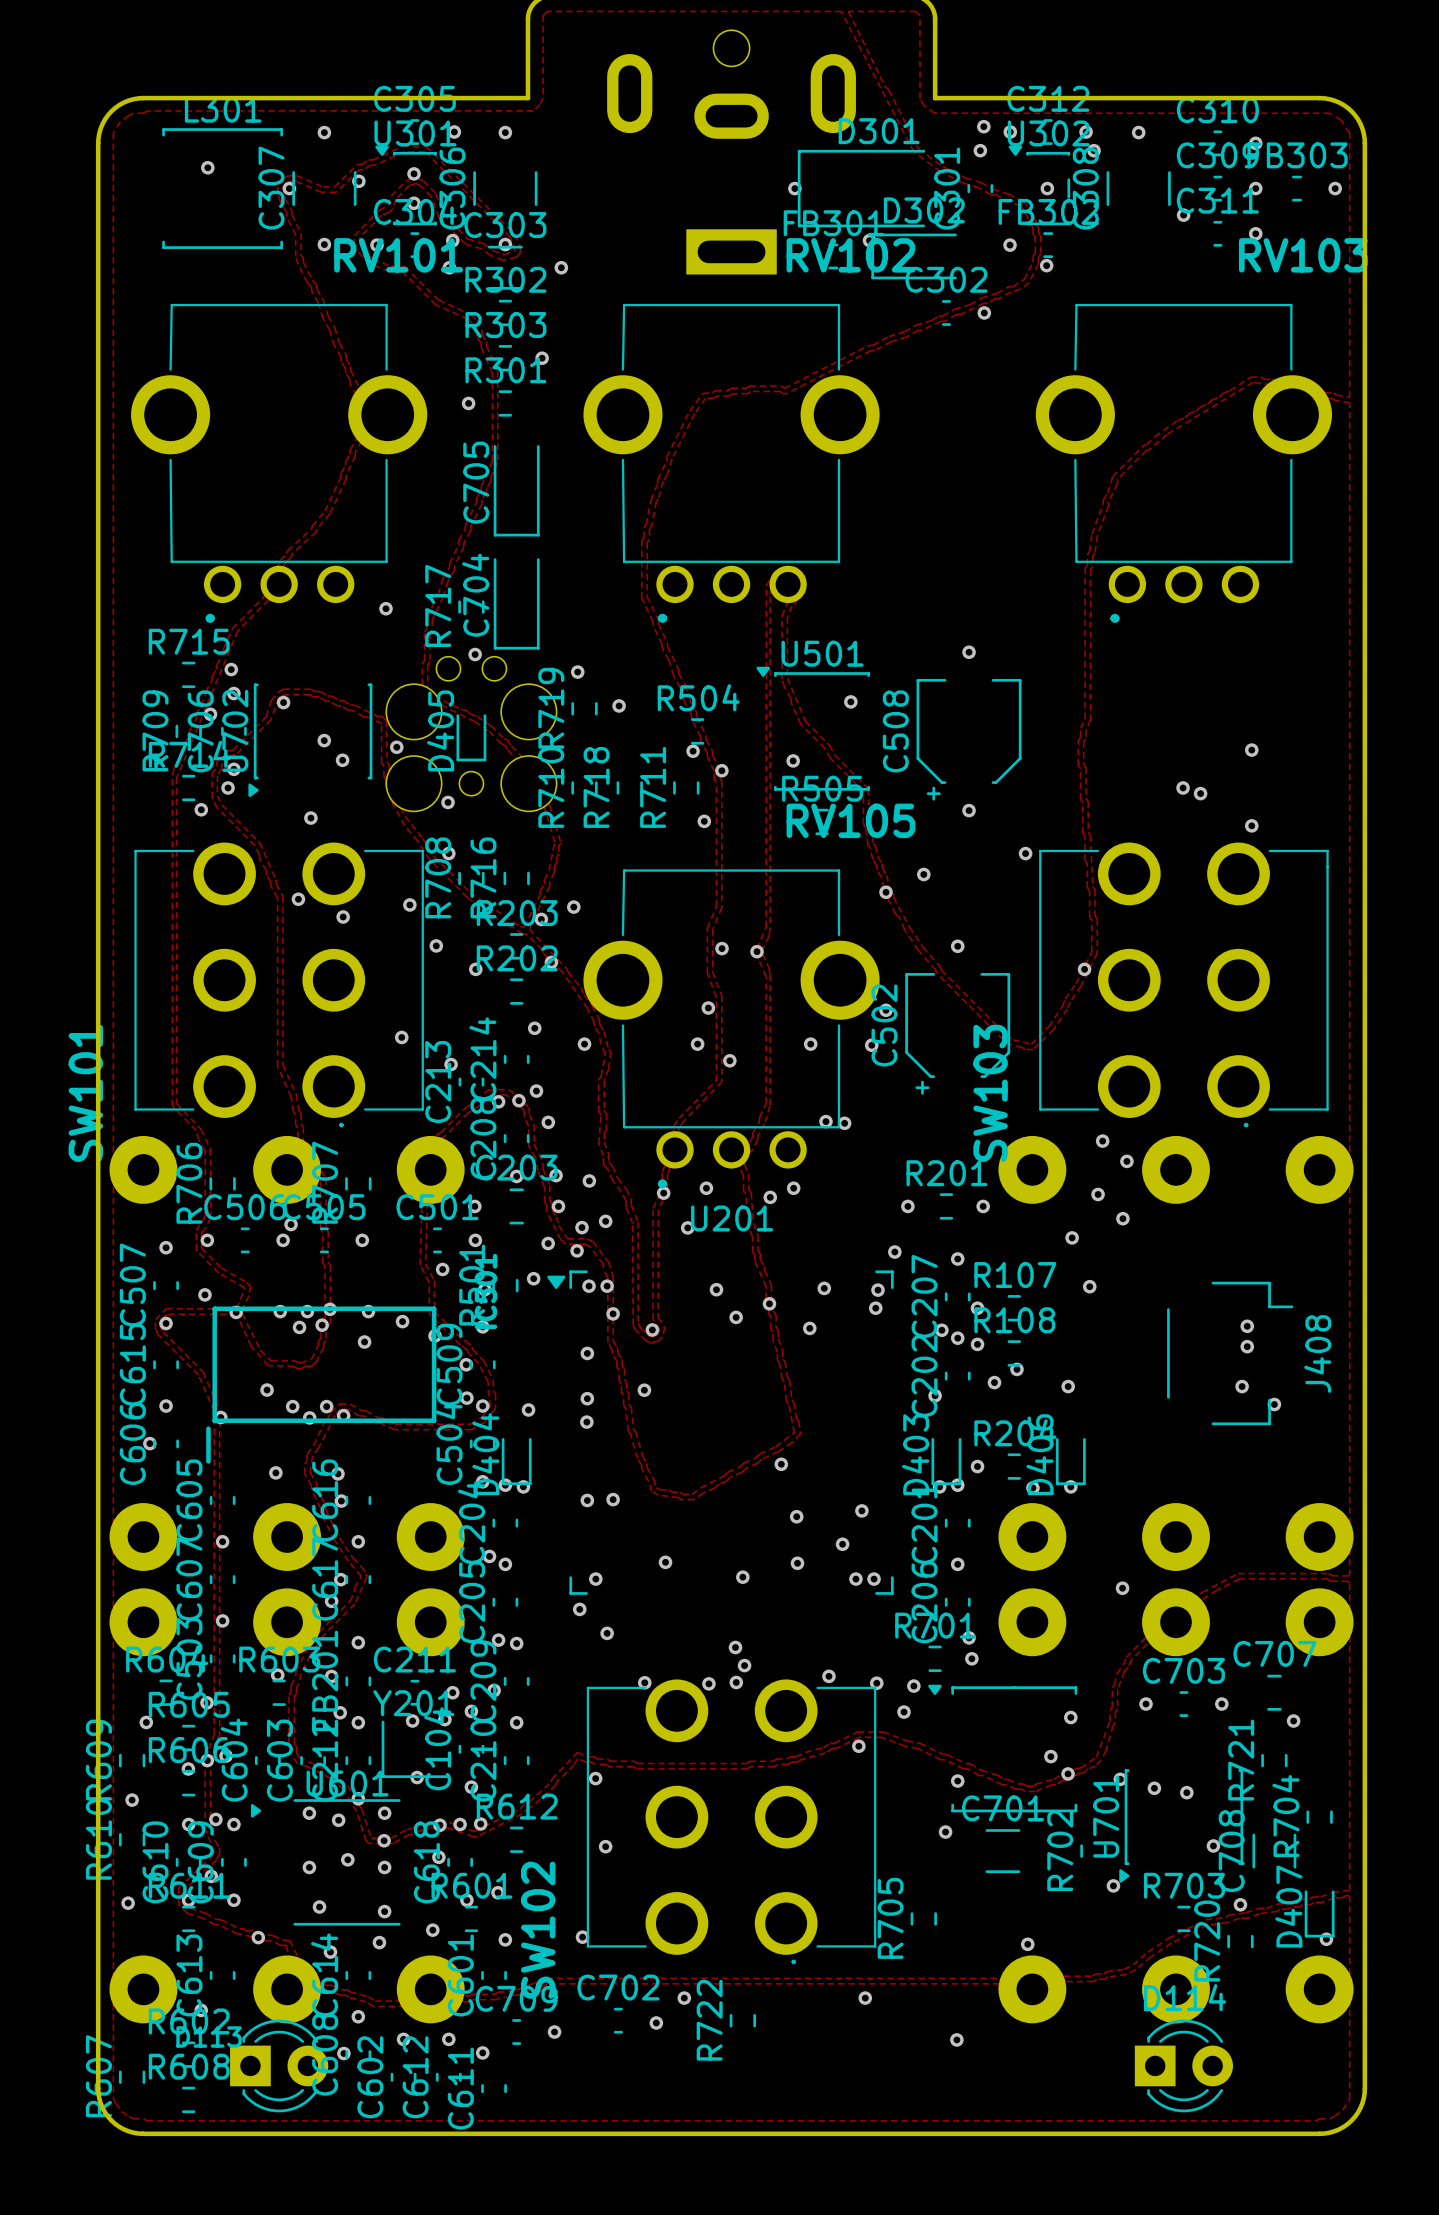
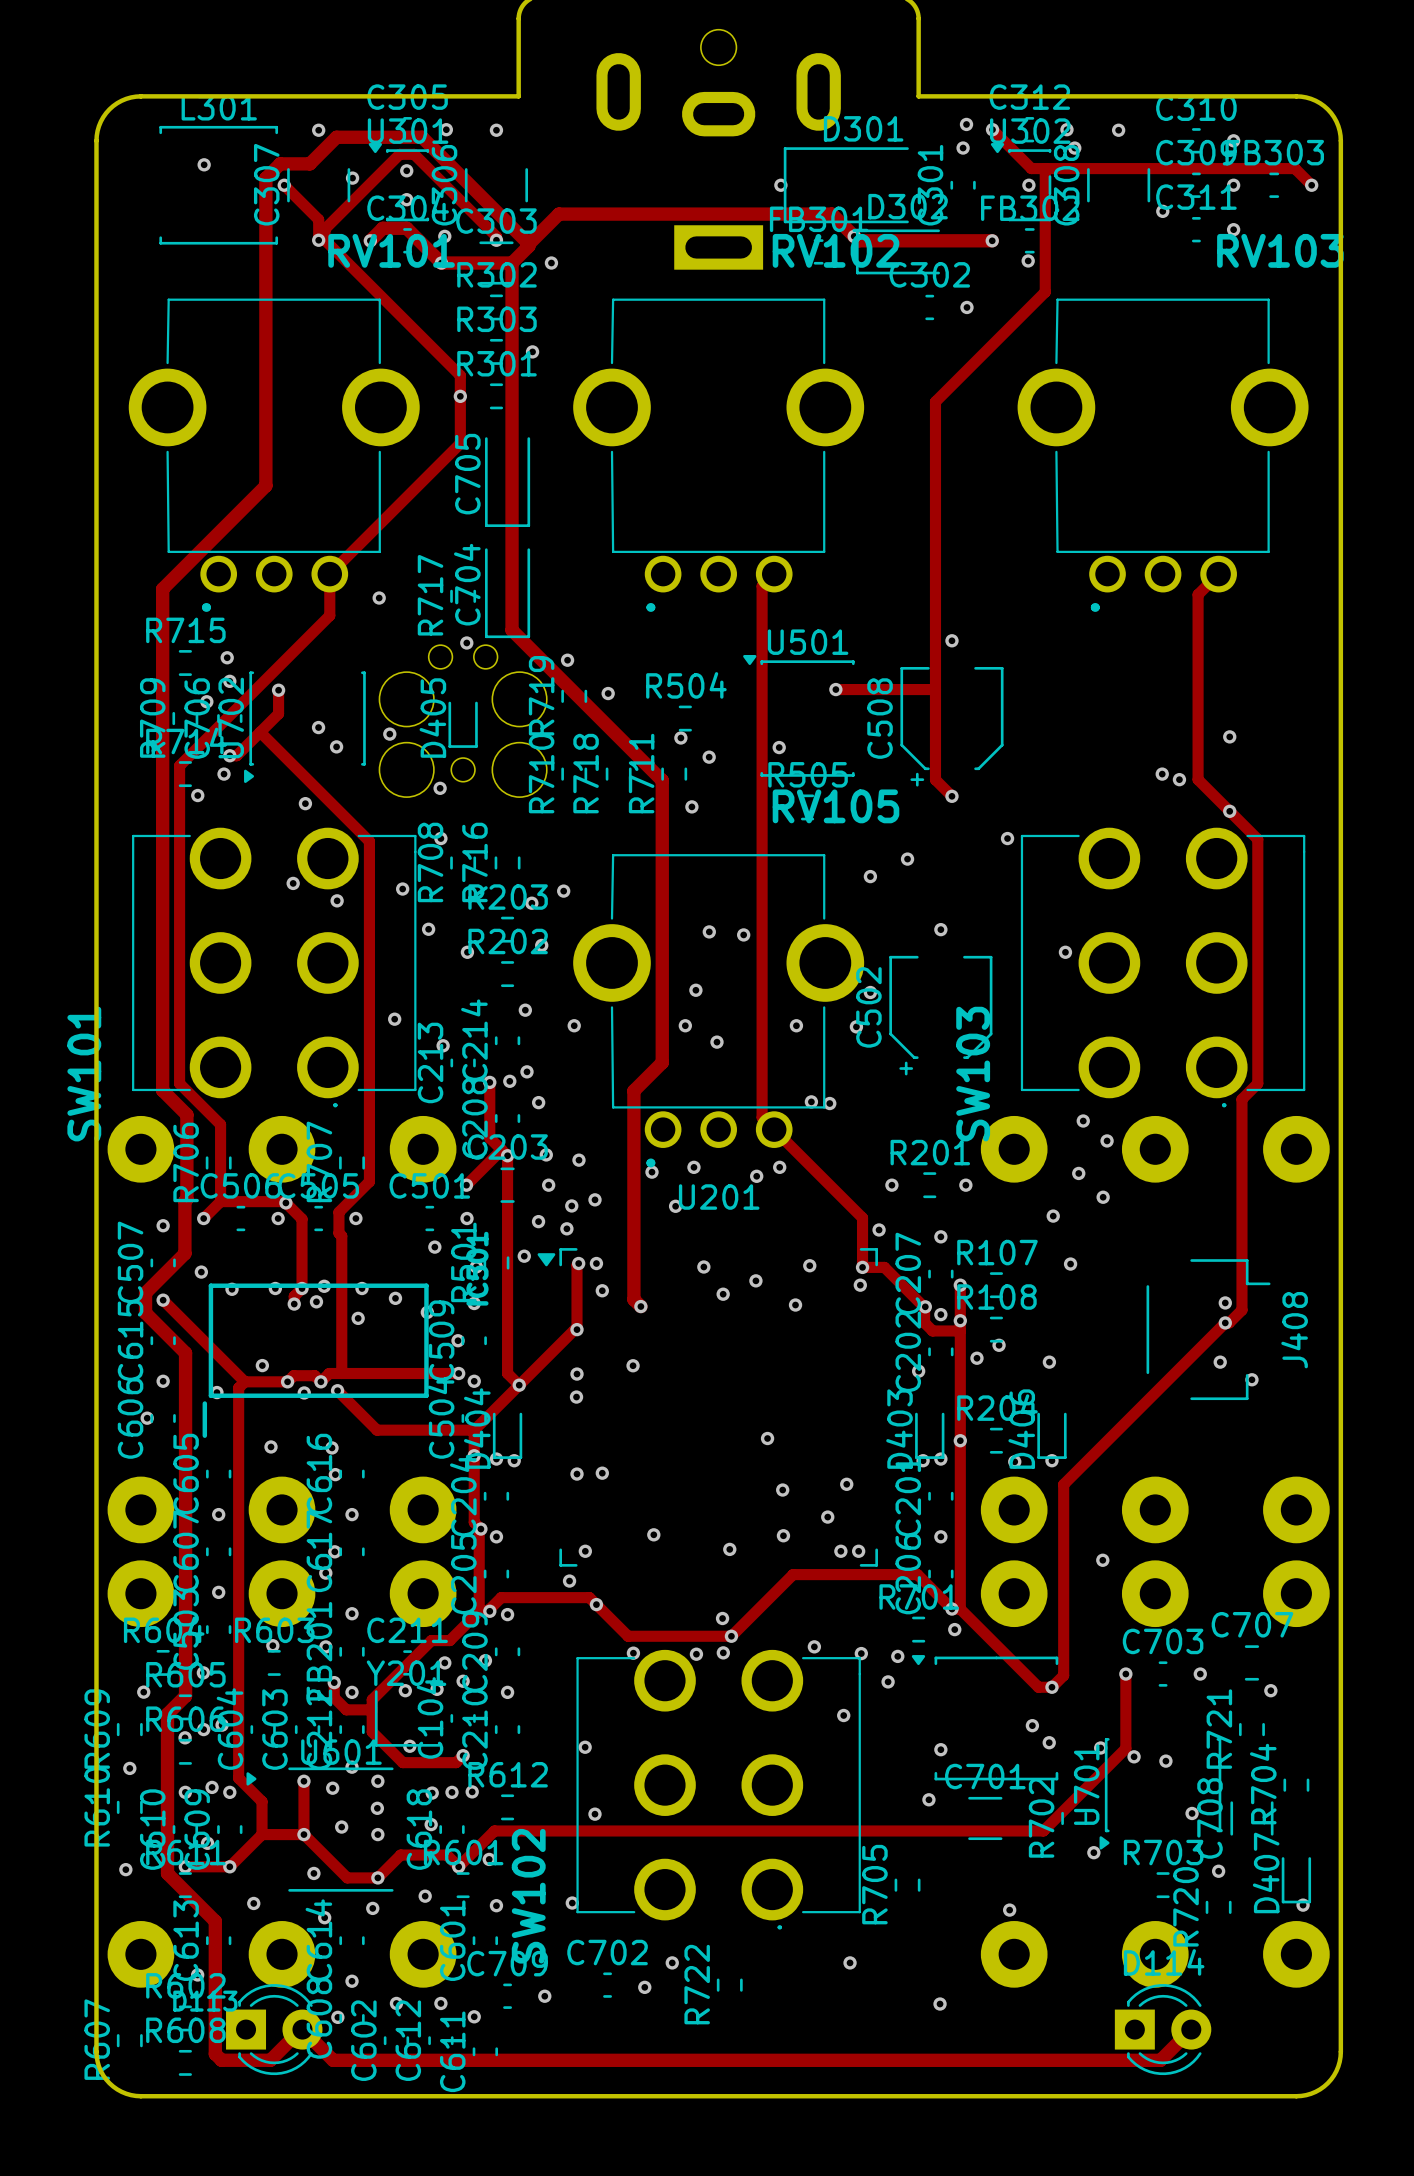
zone outline: (547, 11) (841, 11) (913, 151) (940, 171) (1019, 205) (1033, 228) (1035, 253) (1024, 279) (1013, 286) (868, 345) (784, 388) (781, 386) (749, 386) (746, 388) (731, 388) (728, 390) (702, 393) (689, 411) (657, 479) (641, 541) (641, 598) (680, 687) (684, 703) (691, 714) (700, 741) (707, 752) (716, 782) (716, 906) (707, 928) (707, 973) (716, 997) (716, 1080) (673, 1125) (673, 1146) (662, 1171) (662, 1189) (653, 1208) (653, 1319) (659, 1329) (657, 1334) (652, 1337) (640, 1327) (638, 1322) (638, 1221) (631, 1205) (630, 1198) (608, 1162) (608, 1154) (604, 1141) (606, 1113) (604, 1110) (604, 1080) (608, 1068) (610, 1051) (599, 1019) (581, 987) (567, 969) (529, 929) (549, 886) (560, 842) (549, 805) (533, 772) (507, 739) (491, 725) (465, 709) (461, 709) (425, 691) (427, 686) (432, 619) (497, 462) (497, 371) (481, 330) (471, 314) (438, 300) (404, 266) (391, 266) (373, 259) (362, 248) (359, 237) (382, 215) (392, 208) (396, 198) (409, 185) (416, 183) (431, 196) (438, 217) (465, 243) (481, 248) (490, 255) (503, 260) (516, 257) (520, 252) (520, 246) (514, 234) (426, 146) (402, 146) (357, 164) (334, 186) (323, 186) (296, 175) (286, 176) (277, 184) (279, 200) (295, 234) (295, 256) (298, 264) (311, 286) (364, 417) (325, 510) (311, 528) (287, 550) (280, 560) (264, 596) (232, 628) (172, 775) (172, 1105) (196, 1130) (205, 1151) (205, 1216) (196, 1230) (196, 1250) (218, 1272) (244, 1287) (236, 1308) (166, 1308) (155, 1319) (155, 1328) (158, 1334) (198, 1374) (214, 1411) (214, 1734) (205, 1758) (205, 1828) (214, 1852) (211, 1856) (178, 1887) (178, 1904) (187, 1913) (203, 1918) (237, 1933) (286, 1945) (300, 1979) (307, 1985) (345, 1995) (373, 2006) (405, 2006) (409, 2004) (422, 2004) (434, 1999) (461, 1999) (468, 2001) (472, 1999) (496, 1999) (499, 1997) (519, 1995) (547, 1983) (1061, 1983) (1065, 1981) (1093, 1981) (1126, 1974) (1171, 1943) (1207, 1925) (1227, 1922) (1280, 1909) (1288, 1909) (1349, 1895) (1349, 2098) (1342, 2110) (1329, 2118) (1319, 2118) (1316, 2120) (146, 2120) (128, 2116) (121, 2111) (113, 2098) (113, 133) (120, 121) (128, 115) (146, 110) (533, 110) (540, 104) (543, 98) (543, 15) (547, 11) -> none
zone outline: (848, 11) (915, 11) (919, 15) (920, 98) (924, 105) (934, 113) (1329, 113) (1341, 120) (1349, 133) (1349, 397) (1313, 388) (1304, 388) (1292, 383) (1284, 383) (1272, 379) (1250, 377) (1177, 420) (1154, 436) (1112, 476) (1092, 533) (1087, 565) (1085, 568) (1085, 718) (1078, 740) (1078, 765) (1080, 768) (1080, 799) (1082, 802) (1082, 833) (1085, 836) (1085, 860) (1087, 863) (1087, 887) (1089, 890) (1089, 916) (1091, 920) (1091, 951) (1062, 1006) (1048, 1026) (1031, 1044) (1013, 1039) (1006, 1035) (941, 970) (909, 927) (893, 897) (873, 843) (868, 823) (868, 788) (834, 755) (829, 745) (805, 721) (787, 678) (787, 617) (791, 605) (805, 592) (805, 576) (795, 567) (783, 567) (773, 573) (766, 585) (766, 927) (757, 948) (757, 956) (766, 976) (766, 1103) (752, 1137) (739, 1160) (739, 1165) (743, 1175) (743, 1190) (745, 1193) (748, 1224) (752, 1236) (752, 1252) (766, 1286) (770, 1328) (794, 1432) (775, 1446) (759, 1454) (691, 1494) (682, 1494) (656, 1487) (633, 1429) (629, 1393) (624, 1379) (624, 1368) (613, 1341) (613, 1276) (608, 1261) (592, 1241) (586, 1238) (567, 1238) (558, 1225) (552, 1209) (549, 1185) (543, 1169) (542, 1162) (534, 1144) (534, 1124) (528, 1107) (508, 1089) (487, 1090) (436, 1135) (435, 1153) (422, 1190) (420, 1264) (429, 1282) (429, 1314) (467, 1349) (478, 1363) (487, 1381) (490, 1406) (481, 1417) (470, 1424) (395, 1424) (350, 1404) (340, 1403) (330, 1412) (323, 1424) (307, 1454) (304, 1474) (334, 1540) (361, 1576) (349, 1601) (319, 1632) (295, 1671) (288, 1694) (288, 1744) (291, 1754) (297, 1763) (330, 1778) (343, 1788) (356, 1811) (366, 1840) (369, 1843) (392, 1843) (409, 1834) (429, 1827) (447, 1827) (476, 1836) (522, 1813) (532, 1806) (555, 1785) (577, 1758) (595, 1764) (633, 1766) (636, 1768) (747, 1768) (750, 1766) (774, 1766) (777, 1764) (797, 1762) (836, 1748) (859, 1737) (881, 1737) (905, 1746) (918, 1748) (1002, 1784) (1025, 1791) (1035, 1791) (1083, 1773) (1101, 1760) (1115, 1722) (1117, 1689) (1124, 1671) (1131, 1659) (1178, 1615) (1216, 1590) (1239, 1578) (1327, 1578) (1330, 1581) (1347, 1581) (1349, 1583) (1349, 1890) (1278, 1903) (1225, 1917) (1205, 1919) (1168, 1938) (1123, 1969) (1095, 1973) (1092, 1976) (1064, 1976) (1060, 1978) (546, 1978) (517, 1989) (498, 1992) (495, 1994) (471, 1994) (467, 1996) (462, 1994) (432, 1994) (404, 2001) (375, 2001) (347, 1989) (309, 1980) (298, 1963) (289, 1940) (239, 1928) (205, 1913) (189, 1908) (182, 1901) (183, 1890) (216, 1859) (219, 1853) (219, 1848) (210, 1827) (210, 1759) (219, 1735) (219, 1410) (203, 1372) (163, 1332) (159, 1325) (159, 1320) (167, 1314) (236, 1314) (251, 1346) (268, 1365) (293, 1366) (301, 1368) (311, 1366) (316, 1361) (323, 1347) (325, 1331) (330, 1322) (330, 1265) (328, 1261) (328, 1231) (325, 1227) (325, 1178) (316, 1161) (303, 1146) (301, 1113) (296, 1094) (283, 1065) (282, 896) (259, 842) (221, 804) (217, 795) (217, 775) (221, 764) (230, 755) (236, 754) (270, 719) (278, 697) (284, 694) (309, 694) (318, 696) (381, 723) (381, 762) (383, 766) (383, 777) (390, 800) (404, 825) (429, 859) (467, 897) (506, 924) (522, 934) (526, 934) (542, 949) (562, 972) (587, 1008) (594, 1022) (605, 1053) (598, 1079) (598, 1111) (601, 1114) (598, 1143) (603, 1155) (603, 1164) (625, 1200) (626, 1207) (632, 1223) (633, 1324) (635, 1330) (645, 1340) (650, 1343) (658, 1341) (662, 1336) (664, 1327) (658, 1317) (658, 1209) (667, 1190) (667, 1173) (678, 1148) (678, 1128) (721, 1081) (721, 996) (712, 972) (712, 929) (721, 907) (721, 781) (712, 750) (705, 739) (696, 712) (690, 700) (685, 685) (647, 596) (647, 542) (663, 481) (694, 413) (705, 398) (729, 395) (732, 393) (747, 393) (750, 391) (780, 391) (786, 393) (870, 350) (1020, 289) (1029, 282) (1038, 264) (1040, 254) (1040, 236) (1038, 226) (1028, 207) (1022, 201) (943, 166) (918, 148) (848, 11) -> none
track: none -> (992, 129) (1031, 168) (1295, 168) (1311, 185)
zone outline: (404, 151) (425, 151) (510, 237) (515, 250) (504, 254) (483, 243) (468, 239) (443, 214) (436, 193) (423, 180) (417, 177) (405, 181) (391, 196) (388, 205) (379, 210) (354, 235) (354, 245) (357, 250) (370, 264) (389, 271) (402, 271) (435, 304) (468, 319) (476, 332) (492, 372) (492, 461) (427, 617) (420, 693) (424, 698) (429, 699) (474, 721) (506, 746) (519, 761) (535, 786) (535, 791) (544, 807) (554, 842) (549, 870) (539, 895) (524, 927) (520, 926) (470, 892) (434, 856) (405, 816) (396, 798) (389, 775) (389, 764) (387, 761) (386, 720) (381, 716) (311, 689) (283, 689) (278, 692) (271, 700) (266, 716) (232, 750) (227, 750) (216, 761) (212, 774) (212, 798) (217, 807) (254, 845) (277, 897) (277, 1066) (291, 1096) (295, 1114) (295, 1125) (297, 1128) (298, 1148) (311, 1164) (320, 1180) (320, 1229) (322, 1232) (322, 1263) (325, 1266) (325, 1320) (320, 1330) (320, 1338) (311, 1359) (300, 1363) (295, 1360) (271, 1360) (260, 1350) (242, 1313) (250, 1286) (221, 1268) (201, 1248) (201, 1232) (210, 1217) (210, 1149) (201, 1129) (176, 1103) (176, 777) (237, 630) (268, 599) (285, 562) (292, 553) (316, 531) (329, 513) (370, 417) (316, 284) (303, 262) (301, 255) (300, 233) (285, 198) (283, 186) (289, 181) (296, 181) (321, 192) (336, 192) (359, 169) (404, 151) -> none
track: none -> (1045, 168) (1045, 292) (935, 401) (935, 779) (951, 796)
track: none -> (284, 185) (318, 219) (318, 240) (325, 240)
track: none -> (325, 240) (325, 229) (399, 154) (414, 154) (496, 236) (496, 240)
track: none -> (325, 240) (460, 375) (460, 443) (329, 574) (329, 615) (179, 765) (179, 1083) (220, 1124) (220, 1201)
track: none -> (370, 240) (382, 228) (406, 228) (441, 263) (512, 263)
track: none -> (992, 240) (858, 240) (831, 214) (558, 214) (528, 244)
track: none -> (528, 244) (512, 263)
track: none -> (528, 244) (422, 137) (336, 137) (309, 163) (280, 163) (265, 178) (265, 485) (162, 589) (162, 1090) (186, 1114) (186, 1199) (184, 1201) (184, 1253) (145, 1293) (145, 1313) (185, 1353) (185, 1696) (167, 1714) (167, 1873) (215, 1921) (215, 2054) (221, 2060) (270, 2060) (302, 2029) (333, 2060) (1160, 2060) (1191, 2029)
track: none -> (512, 263) (512, 630) (662, 780) (662, 1062) (633, 1090) (633, 1299) (640, 1306)
zone outline: (1252, 382) (1271, 384) (1283, 389) (1291, 389) (1303, 393) (1311, 393) (1323, 398) (1349, 402) (1349, 1575) (1332, 1575) (1328, 1573) (1238, 1573) (1202, 1592) (1166, 1617) (1126, 1657) (1116, 1673) (1112, 1687) (1109, 1721) (1096, 1757) (1081, 1768) (1033, 1786) (1026, 1786) (1004, 1779) (920, 1743) (906, 1740) (883, 1731) (857, 1731) (834, 1743) (796, 1756) (776, 1759) (773, 1761) (749, 1761) (746, 1763) (637, 1763) (634, 1761) (596, 1759) (577, 1752) (551, 1782) (529, 1801) (520, 1808) (474, 1831) (449, 1822) (428, 1822) (407, 1829) (391, 1838) (371, 1838) (361, 1809) (347, 1785) (332, 1772) (298, 1757) (294, 1743) (294, 1696) (301, 1673) (323, 1635) (354, 1603) (366, 1577) (361, 1566) (353, 1558) (339, 1537) (310, 1472) (312, 1456) (335, 1415) (340, 1409) (348, 1409) (394, 1429) (471, 1429) (484, 1422) (495, 1408) (493, 1380) (483, 1360) (472, 1346) (434, 1311) (434, 1280) (425, 1264) (427, 1191) (441, 1155) (441, 1137) (490, 1094) (506, 1094) (524, 1110) (524, 1116) (528, 1126) (528, 1145) (535, 1157) (537, 1170) (544, 1187) (546, 1211) (560, 1239) (566, 1244) (585, 1244) (589, 1246) (603, 1264) (607, 1277) (607, 1342) (619, 1370) (619, 1380) (623, 1395) (628, 1431) (651, 1491) (658, 1495) (678, 1497) (681, 1499) (694, 1499) (762, 1459) (778, 1451) (792, 1442) (800, 1433) (776, 1327) (771, 1285) (758, 1250) (757, 1235) (753, 1223) (748, 1174) (744, 1164) (757, 1139) (770, 1106) (770, 974) (762, 949) (770, 929) (770, 596) (771, 587) (778, 576) (784, 572) (793, 572) (800, 578) (800, 590) (787, 603) (782, 616) (781, 679) (784, 686) (800, 724) (824, 748) (830, 758) (863, 791) (863, 824) (868, 845) (895, 913) (918, 950) (936, 973) (1003, 1039) (1011, 1044) (1024, 1049) (1033, 1049) (1053, 1029) (1067, 1008) (1097, 953) (1097, 919) (1095, 915) (1095, 889) (1092, 886) (1090, 835) (1088, 832) (1088, 801) (1085, 798) (1083, 741) (1090, 719) (1090, 569) (1092, 566) (1097, 535) (1117, 479) (1146, 450) (1166, 434) (1252, 382) -> none
track: none -> (774, 574) (762, 586) (762, 1117) (862, 1217) (862, 1267) (884, 1267) (924, 1307)
track: none -> (1218, 574) (1198, 594) (1198, 779) (1257, 839) (1257, 1083) (1241, 1099) (1241, 1310) (1229, 1322) (1225, 1322) (1063, 1484) (1063, 1675) (1051, 1687) (1038, 1687) (960, 1609)
track: none -> (835, 689) (935, 689)
track: none -> (278, 690) (278, 713) (260, 732)
track: none -> (260, 732) (369, 841) (369, 1181) (338, 1212) (338, 1233) (341, 1236) (341, 1373)
track: none -> (260, 732) (236, 755) (229, 755)
track: none -> (489, 1082) (489, 1137) (507, 1155) (507, 1373) (519, 1385)
track: none -> (501, 1149) (466, 1185)
track: none -> (220, 1201) (203, 1218)
track: none -> (220, 1201) (284, 1201) (302, 1219) (302, 1288) (294, 1296) (294, 1304)
track: none -> (578, 1263) (577, 1265) (577, 1329) (574, 1329) (474, 1430)
track: none -> (960, 1285) (960, 1609)
track: none -> (163, 1300) (244, 1381)
track: none -> (924, 1307) (924, 1322) (932, 1330) (960, 1330)
track: none -> (458, 1373) (329, 1373) (320, 1381) (314, 1375) (293, 1375) (287, 1381) (244, 1381)
track: none -> (244, 1381) (238, 1387) (238, 1778) (262, 1801) (262, 1834)
track: none -> (337, 1390) (377, 1430) (474, 1430)
track: none -> (474, 1430) (474, 1522) (480, 1529) (479, 1530) (479, 1611)
track: none -> (960, 1609) (951, 1609) (917, 1574) (793, 1574) (731, 1636) (628, 1636) (589, 1597) (501, 1597) (489, 1611) (479, 1611)
track: none -> (479, 1611) (449, 1640) (431, 1640) (372, 1699) (372, 1731) (402, 1762) (456, 1762) (463, 1755)
track: none -> (1125, 1674) (1125, 1748) (1043, 1830) (494, 1830) (458, 1866) (446, 1855) (400, 1855) (377, 1877) (347, 1877) (303, 1834)
track: none -> (334, 1682) (334, 1697) (346, 1709) (372, 1709)
track: none -> (303, 1781) (303, 1834)
track: none -> (262, 1834) (229, 1866) (185, 1866)
track: none -> (262, 1834) (303, 1834)

